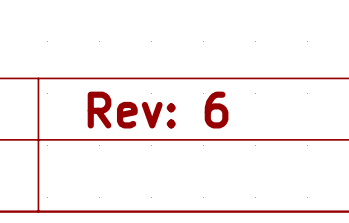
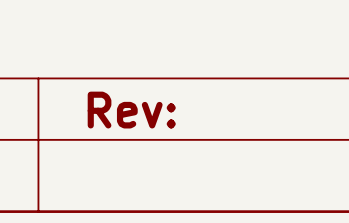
title block: Rev: 6 (158, 110) -> Rev: (131, 110)

